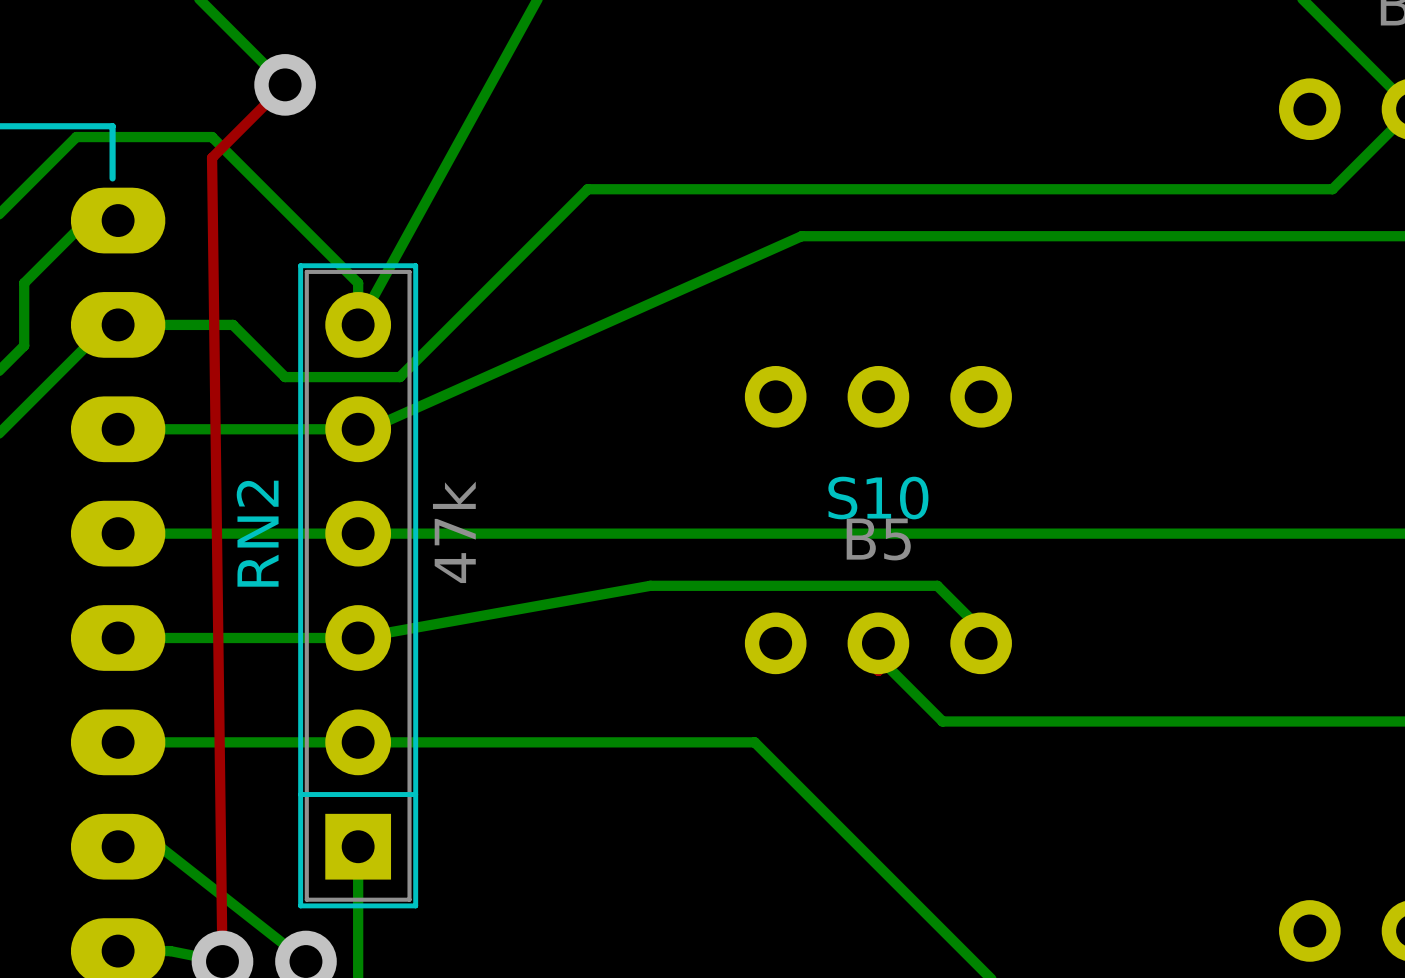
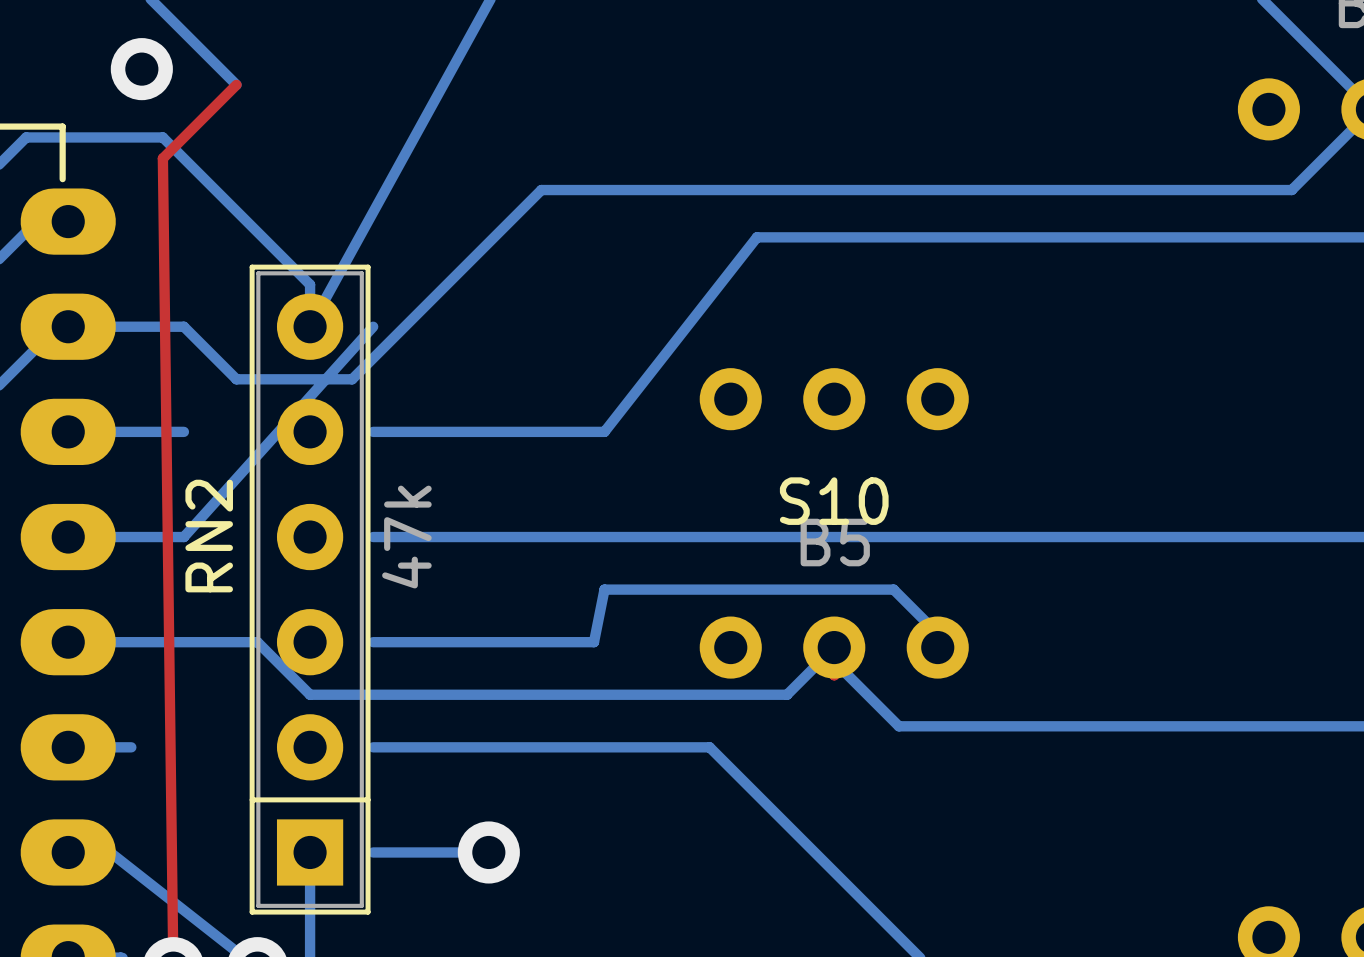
via position: (285, 84) -> (141, 69)
bottom track: (801, 236) (368, 429) (232, 429) -> (756, 237) (604, 431) (373, 431)
bottom track: (232, 533) (420, 533) -> (183, 537) (373, 326)
bottom track: (650, 585) (358, 637) (305, 637) -> (604, 589) (593, 642) (373, 642)
bottom track: none -> (257, 642) (310, 694) (787, 694) (834, 647)
bottom track: (180, 742) (420, 742) -> none
bottom track: none -> (373, 852) (488, 852)
via: none -> (488, 852)

